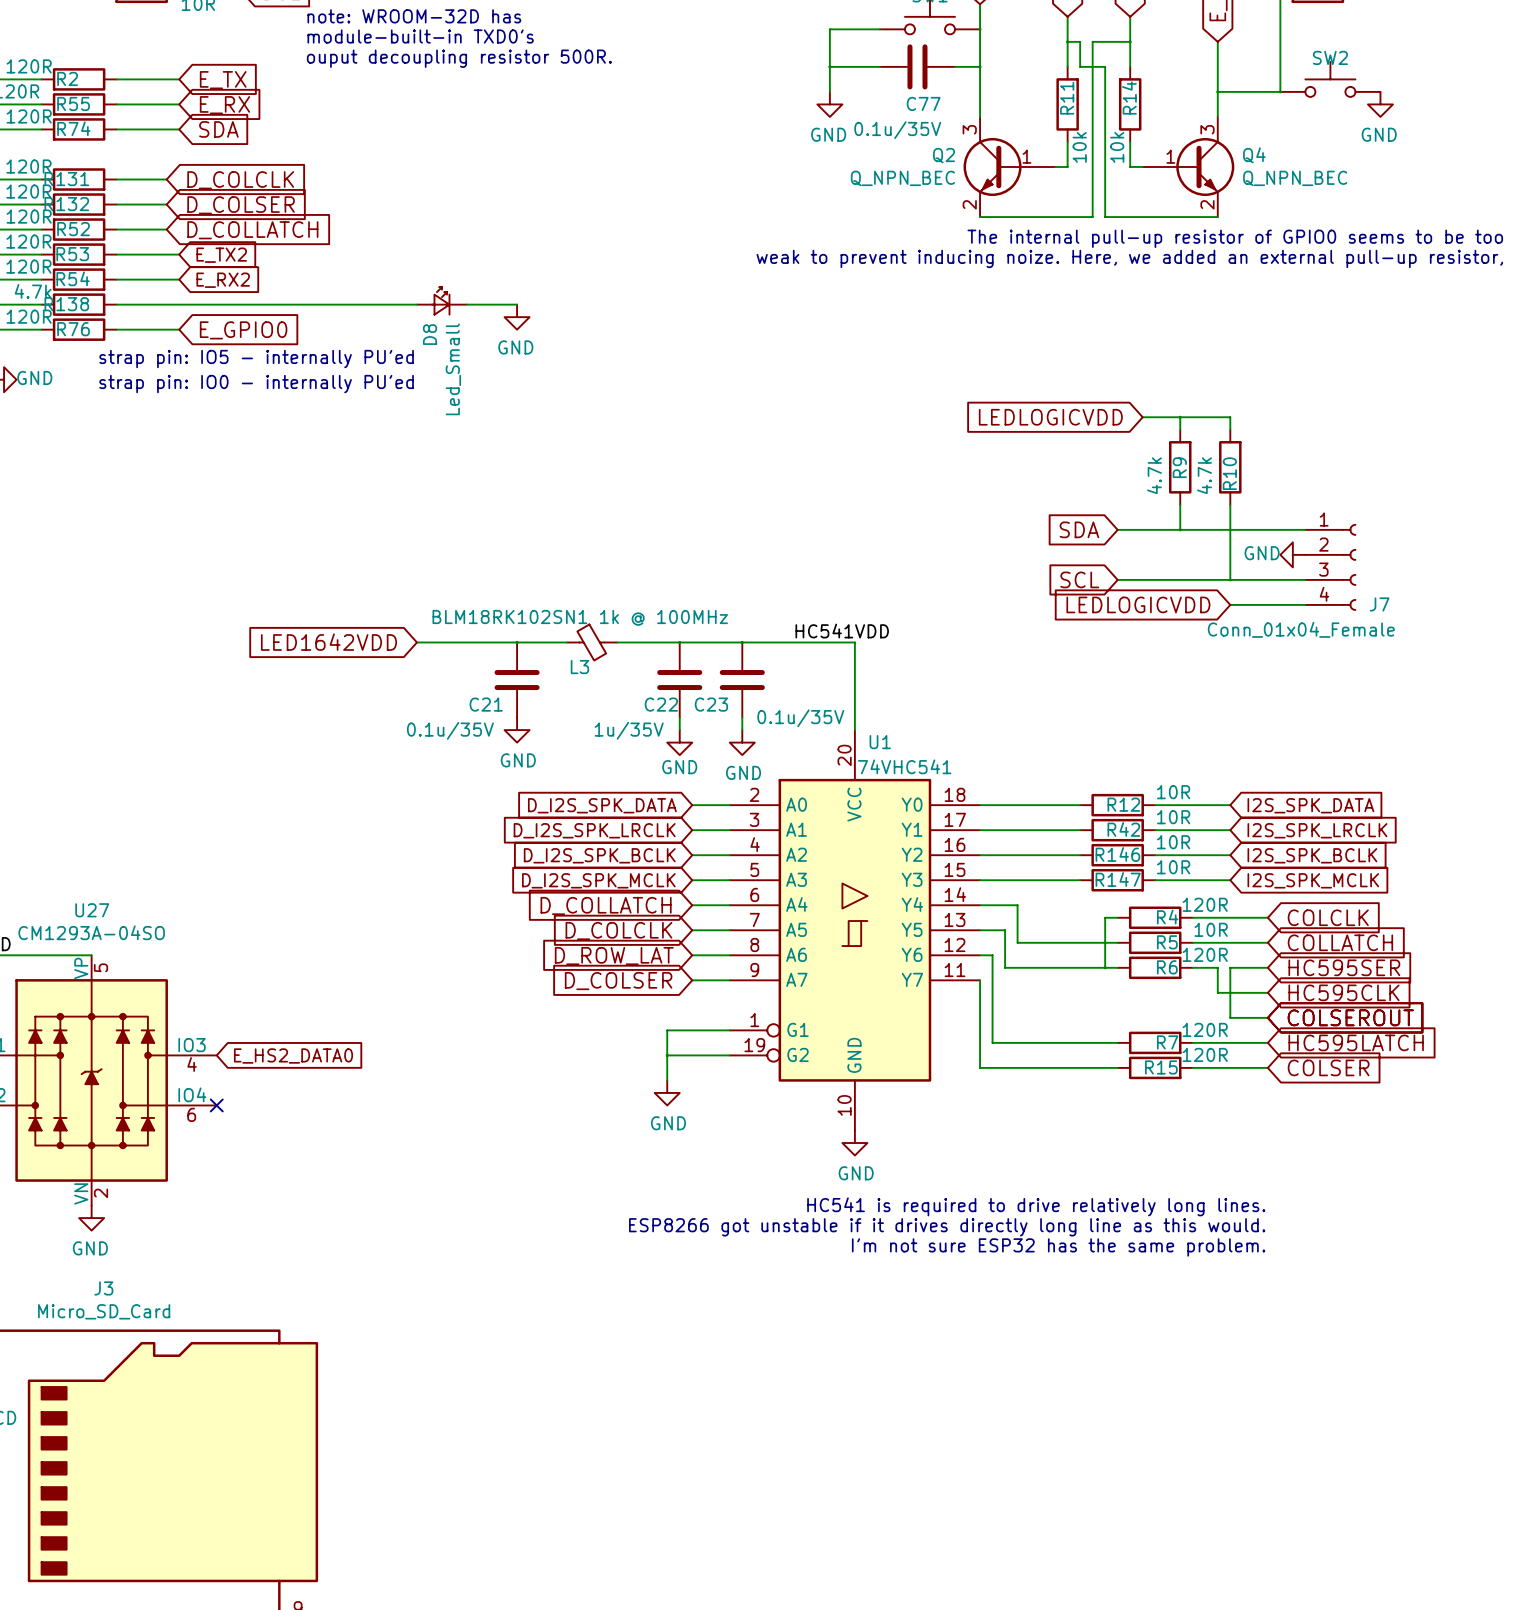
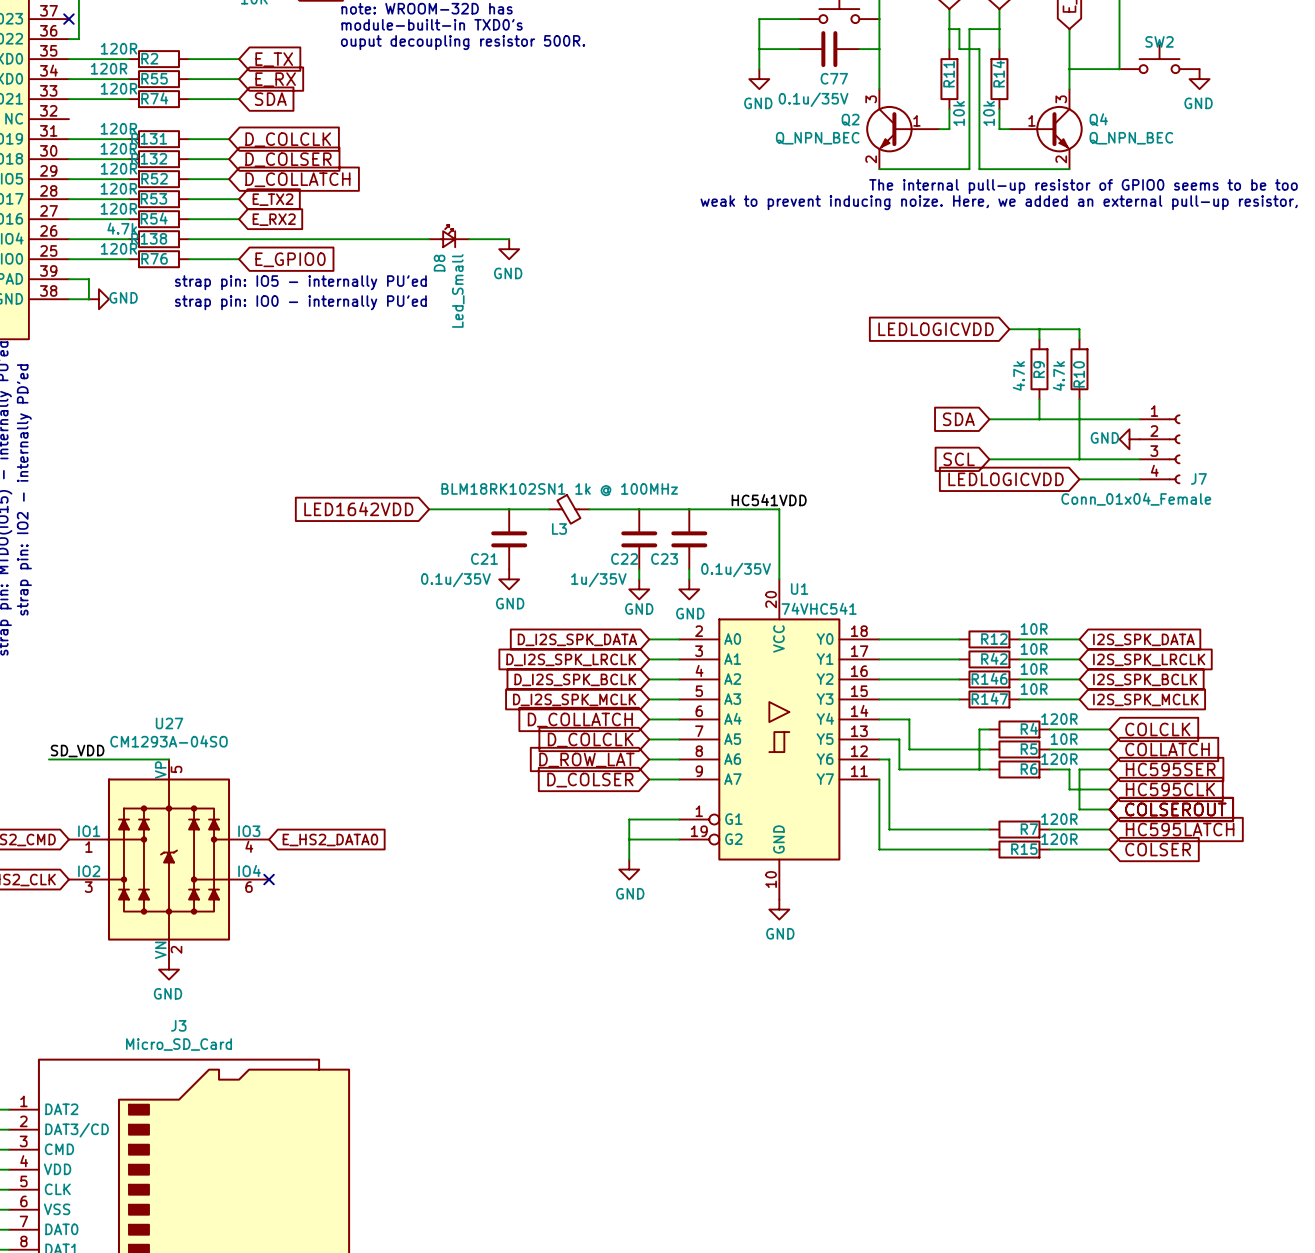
text: HC541 is required to drive relatively long lines. (1036, 1206) -> none
text: ESP8266 got unstable if it drives directly long line as this would. (947, 1227) -> none
text: I'm not sure ESP32 has the same problem. (1058, 1247) -> none

